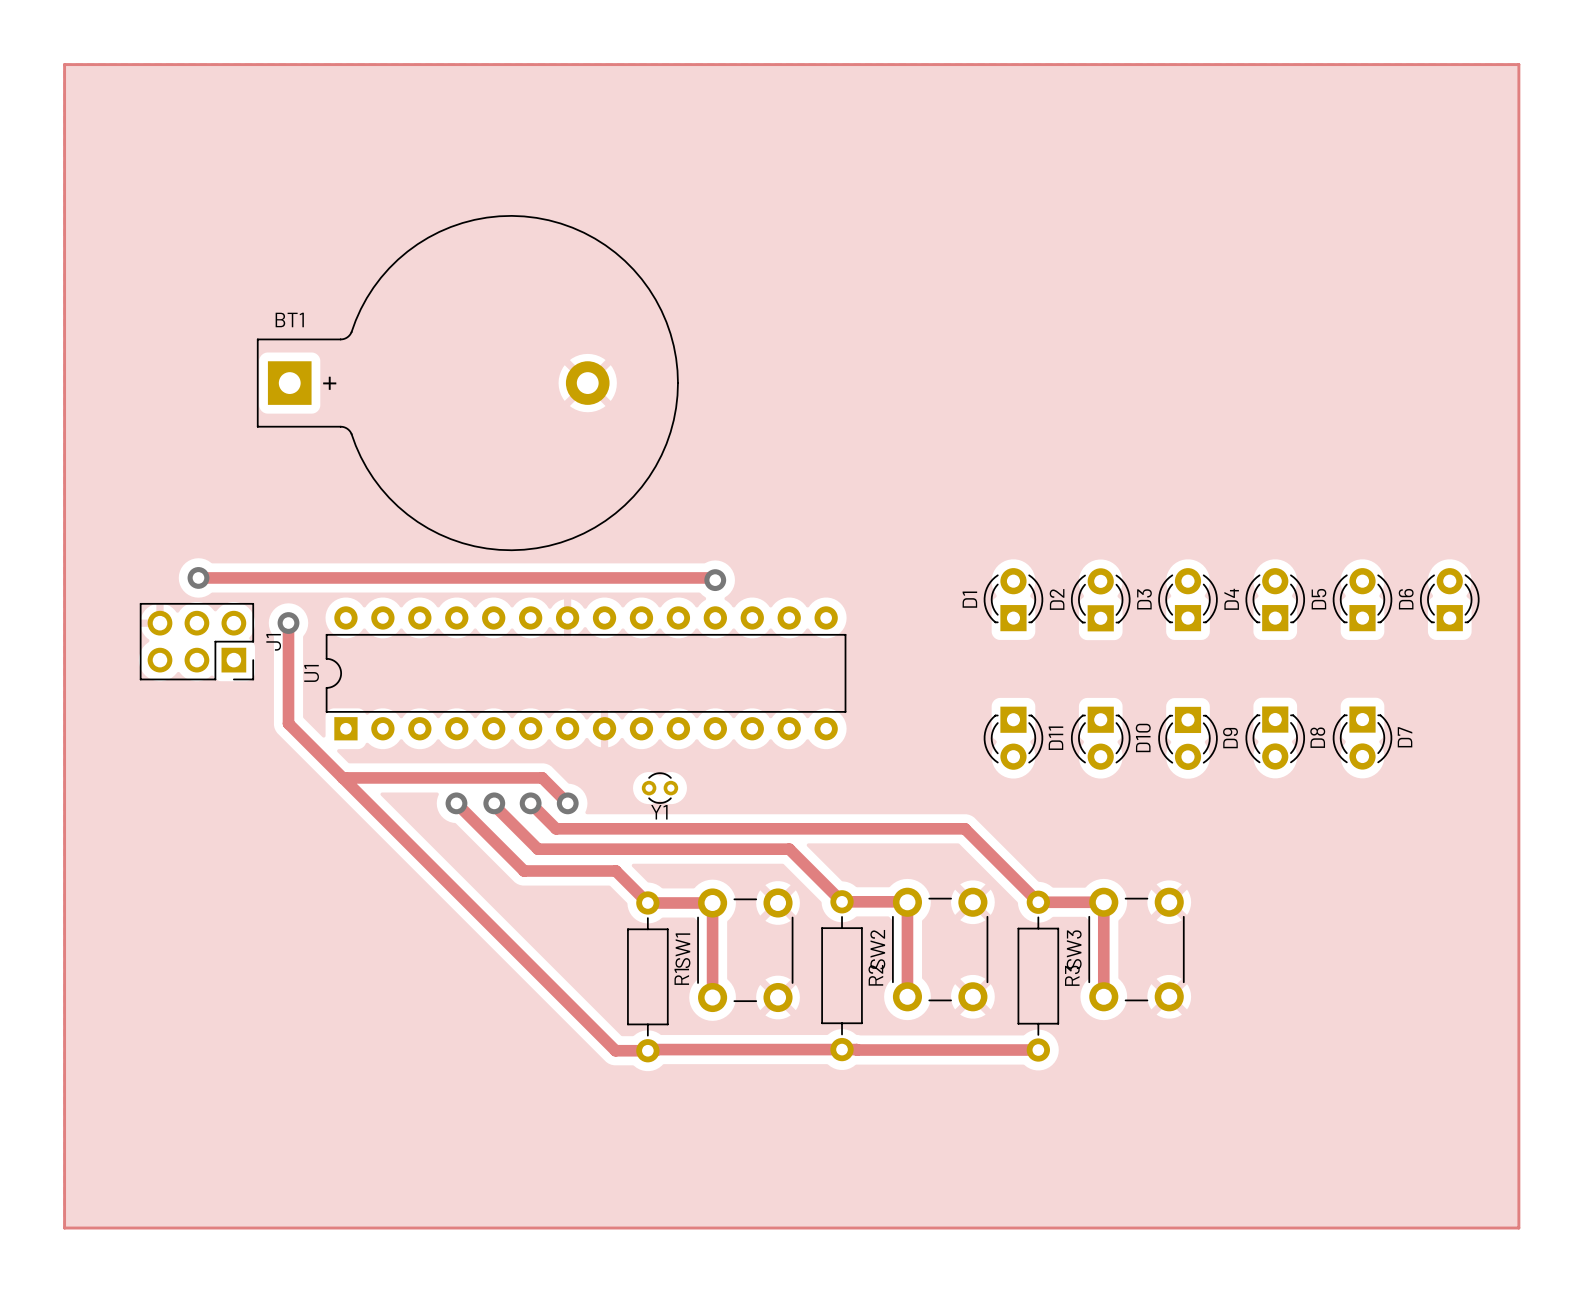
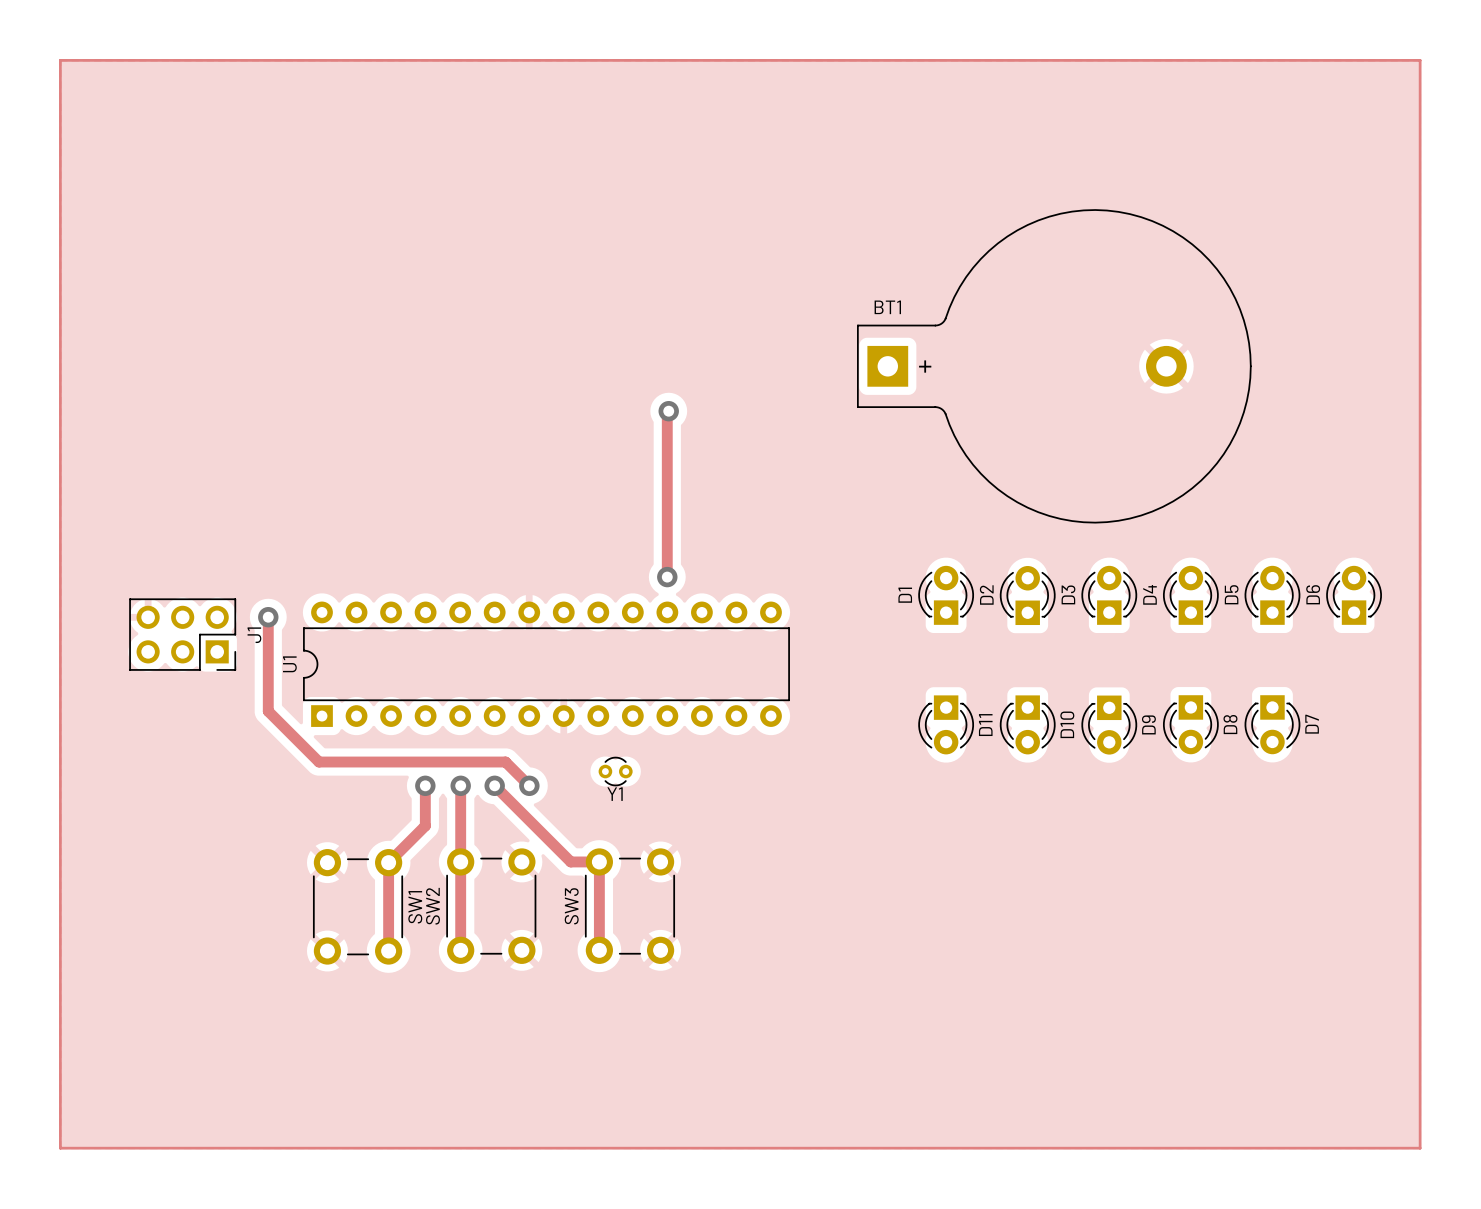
BT1 position: (467, 383) -> (1054, 366)
track: none -> (668, 411) (667, 577)
via: none -> (668, 411)
track: (198, 577) (713, 577) (715, 580) -> none
via: (198, 577) -> none
via position: (715, 580) -> (667, 577)
D1 position: (1013, 599) -> (946, 595)
D2 position: (1100, 599) -> (1027, 595)
D3 position: (1187, 599) -> (1109, 595)
D4 position: (1275, 599) -> (1190, 595)
D5 position: (1362, 599) -> (1272, 595)
D6 position: (1449, 599) -> (1354, 595)
track: (288, 623) (288, 723) (615, 1050) (1038, 1050) -> none
via position: (288, 623) -> (268, 617)
J1 position: (196, 641) -> (182, 634)
track: none -> (268, 617) (268, 711) (319, 762) (505, 762) (529, 785)
U1 position: (586, 673) -> (546, 664)
D11 position: (1013, 738) -> (946, 724)
D10 position: (1100, 738) -> (1027, 724)
D9 position: (1187, 738) -> (1109, 725)
D8 position: (1275, 738) -> (1190, 724)
D7 position: (1362, 738) -> (1272, 724)
track: (342, 777) (542, 777) (567, 803) -> none
Y1 position: (659, 788) -> (615, 771)
track: (456, 803) (524, 870) (615, 870) (647, 902) (712, 902) (712, 997) -> none
via: (456, 803) -> none
track: (494, 803) (537, 849) (789, 849) (842, 901) (907, 901) (907, 996) -> none
via: (494, 803) -> none
track: (530, 803) (556, 828) (964, 828) (1038, 902) (1103, 902) (1103, 996) -> none
via: (530, 803) -> none
via: (567, 803) -> none
track: none -> (425, 785) (425, 825) (388, 862) (388, 951)
via: none -> (425, 785)
track: none -> (460, 785) (460, 950)
via: none -> (460, 785)
track: none -> (494, 785) (570, 861) (599, 861) (599, 950)
via: none -> (494, 785)
via: none -> (529, 785)
SW2 position: (940, 949) -> (491, 906)
SW3 position: (1136, 949) -> (629, 906)
SW1 name position: SW1 (682, 950) -> SW1 (415, 907)
SW1 position: (745, 950) -> (358, 906)
R2: (842, 975) -> none
R1: (647, 976) -> none
R3: (1038, 976) -> none

